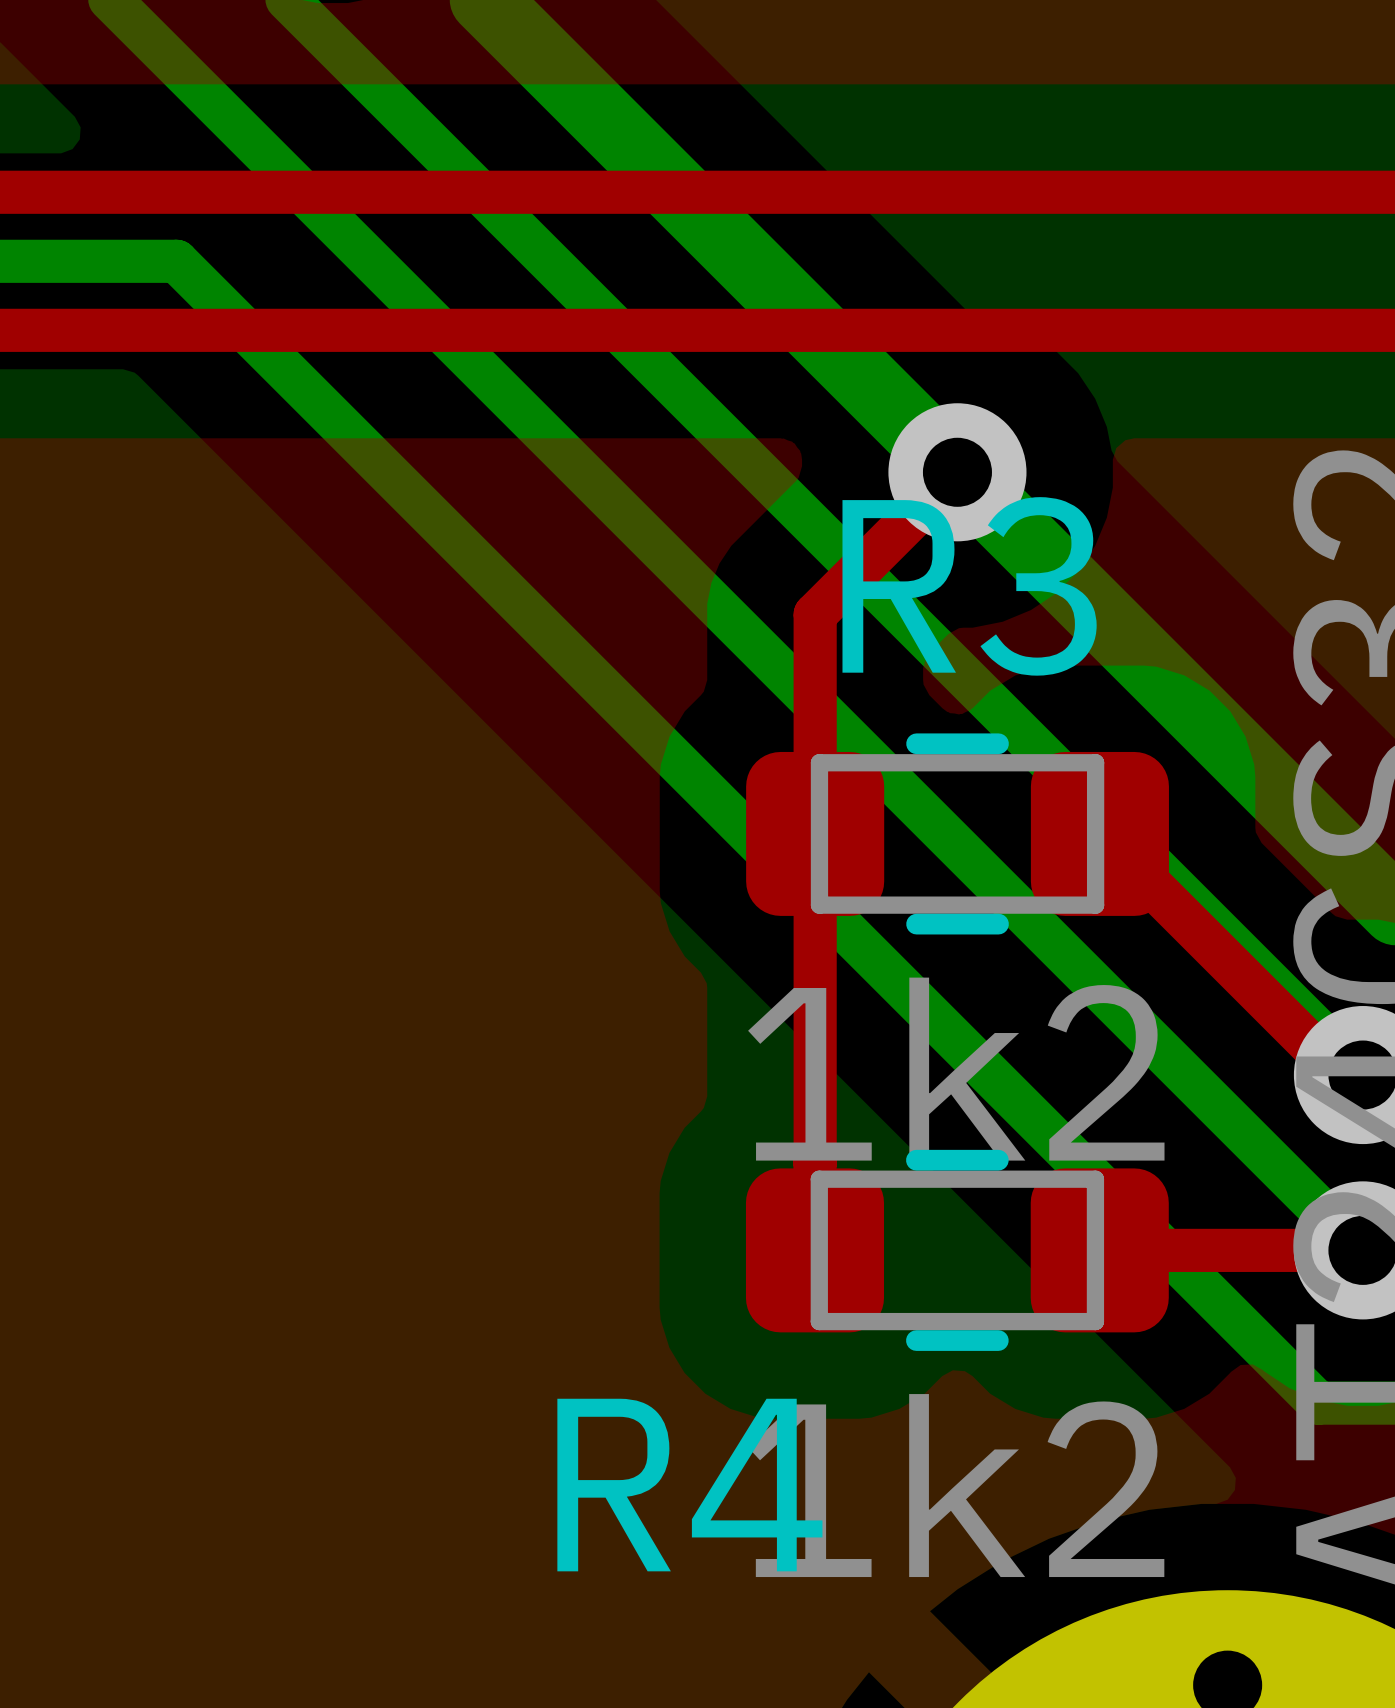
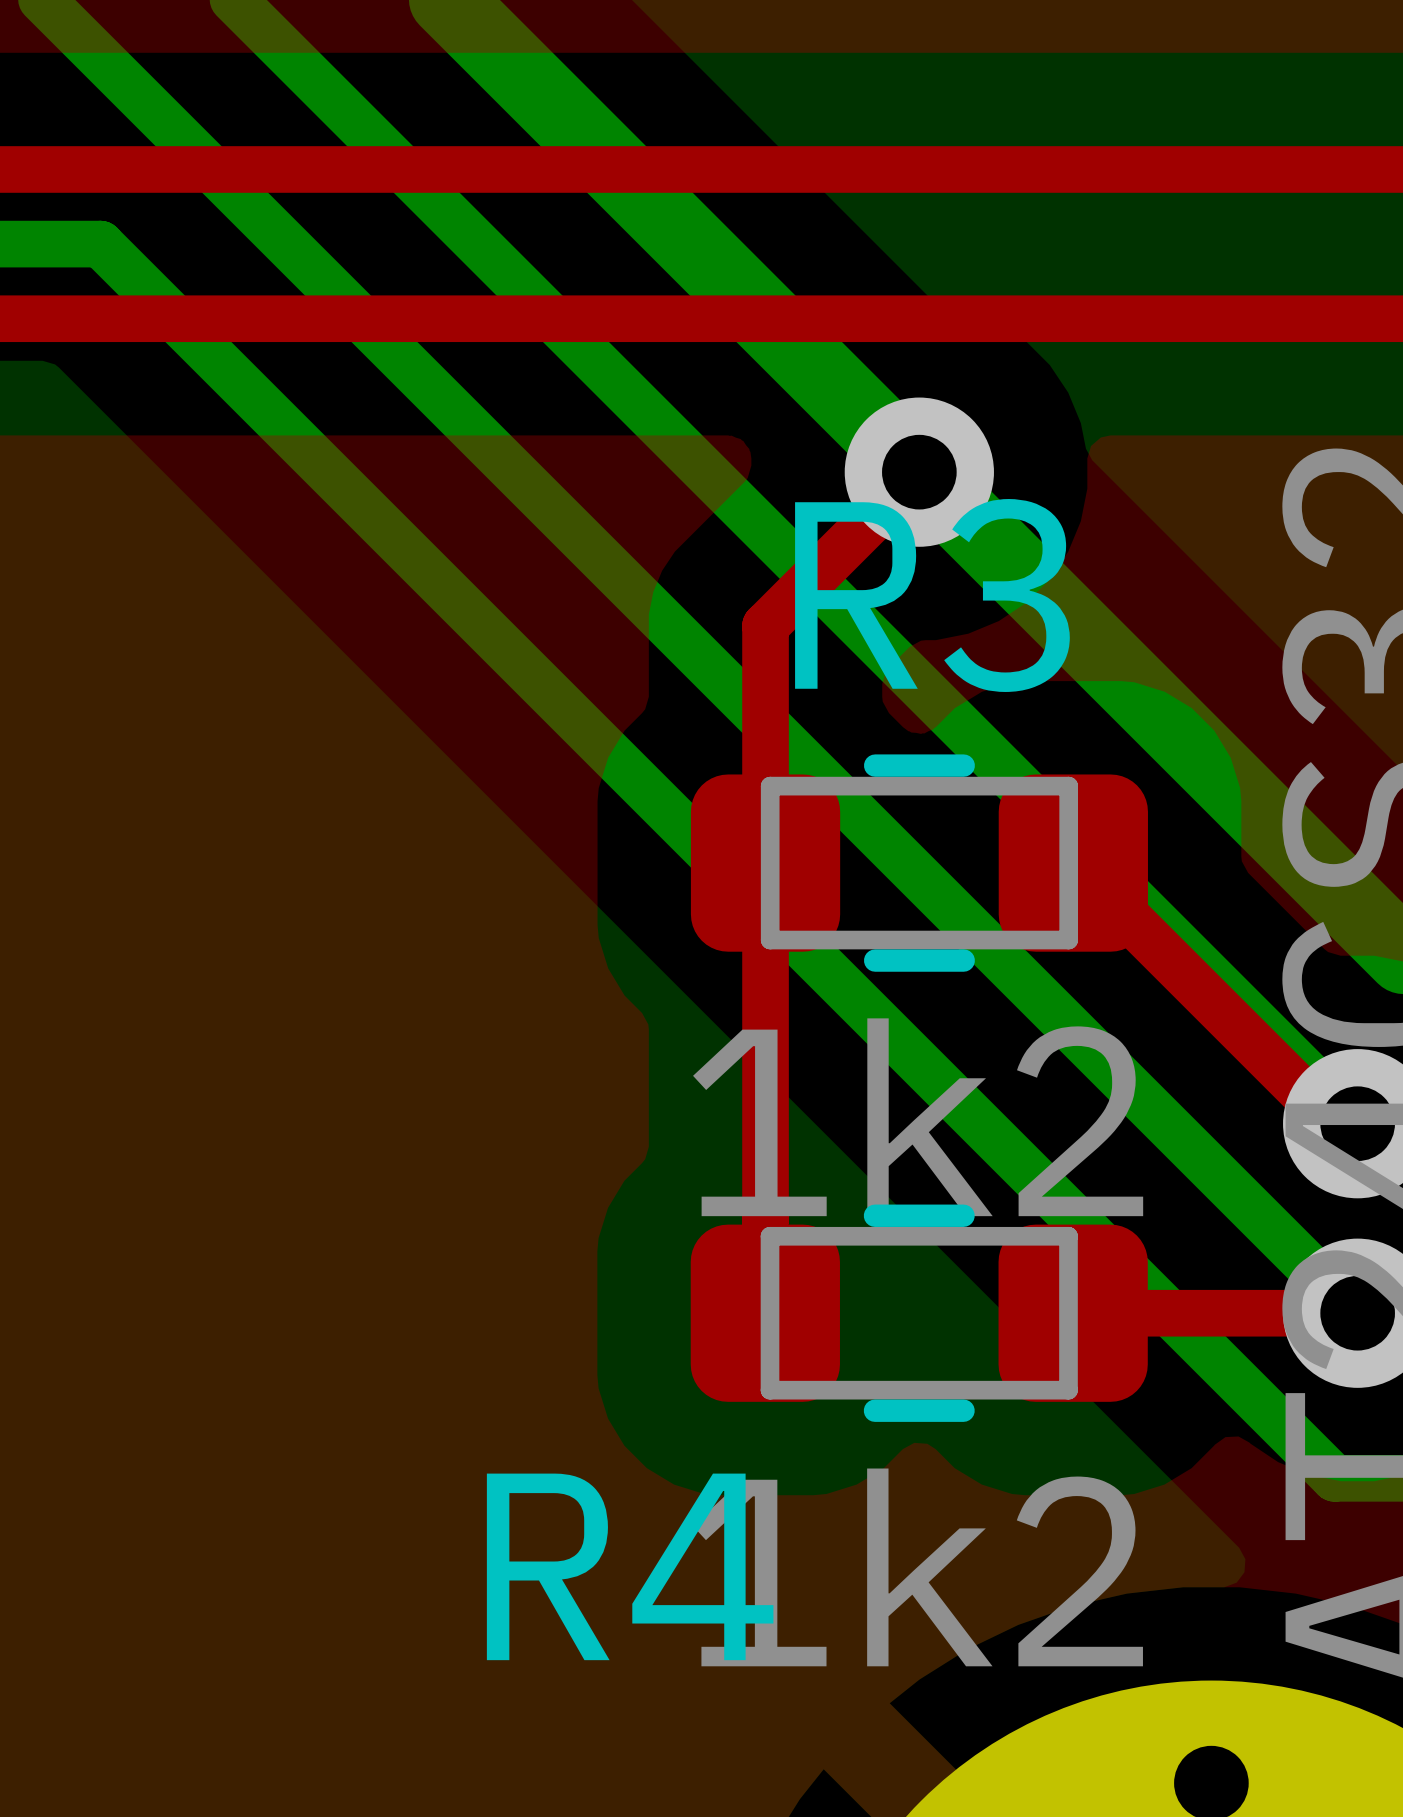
bottom track: (176, 261) (1318, 1403) (1341, 1403) -> (75, 244) (100, 244) (1334, 1478)

